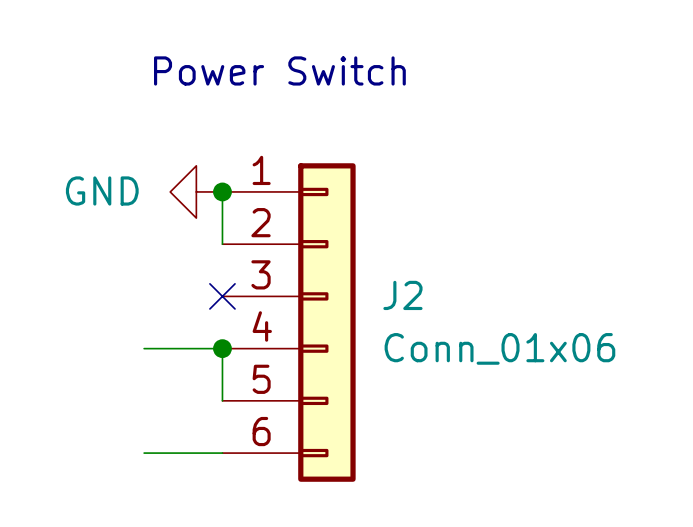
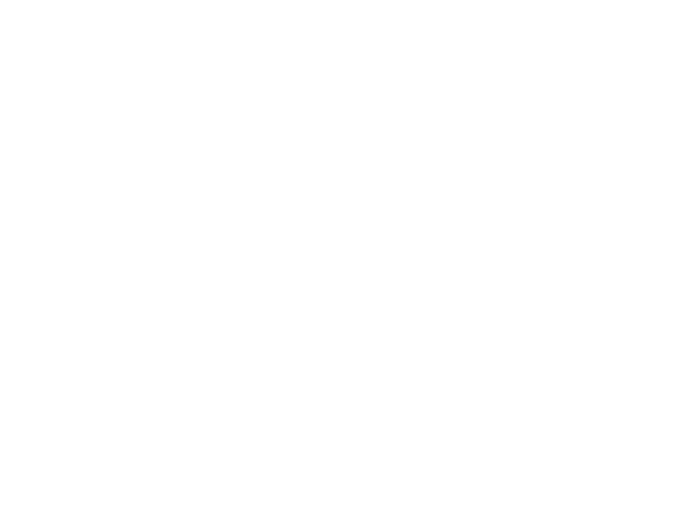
text: Power Switch (279, 70) -> none
power symbol: GND (196, 191) -> none
wire: (222, 191) (222, 244) -> none
junction: (222, 191) -> none
no-connect mark: (222, 296) -> none
J2: Conn_01x06 (289, 322) -> none
wire: (144, 348) (222, 348) (222, 400) -> none
junction: (222, 348) -> none
wire: (144, 453) (222, 453) -> none

